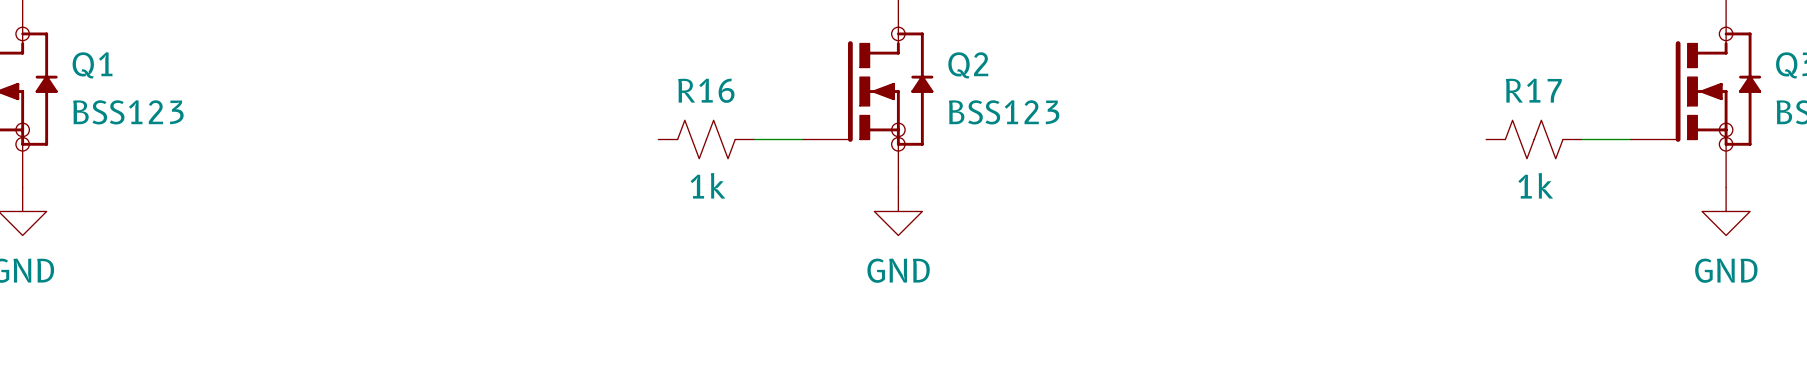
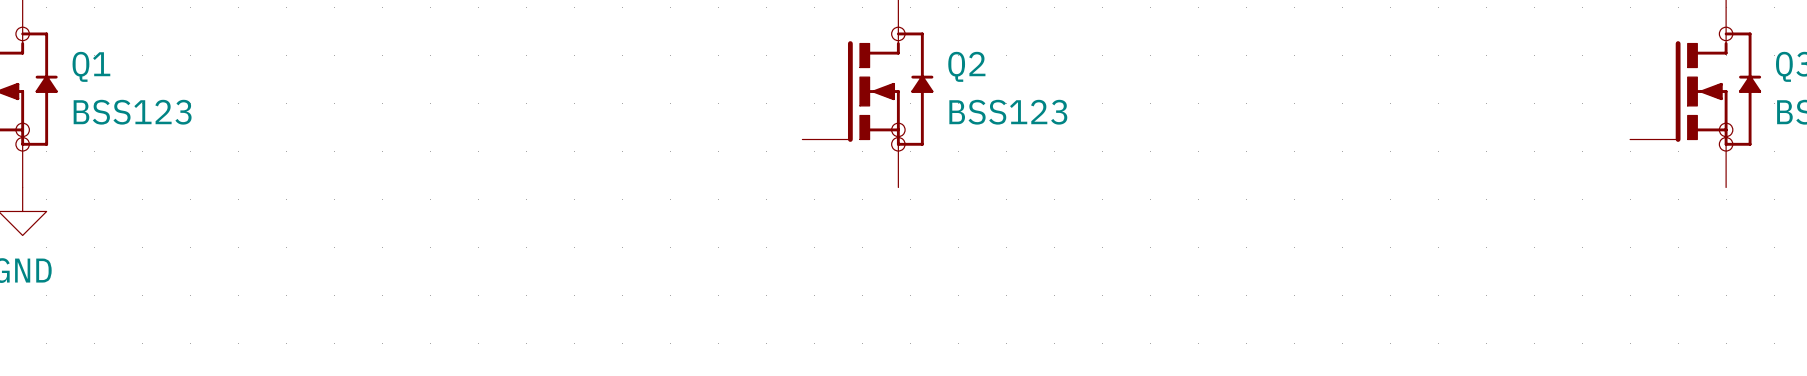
R16: 1k (706, 139) -> none
wire: (754, 139) (802, 139) -> none
R17: 1k (1534, 139) -> none
wire: (1582, 139) (1630, 139) -> none
power symbol: GND (898, 211) -> none
power symbol: GND (1726, 211) -> none

